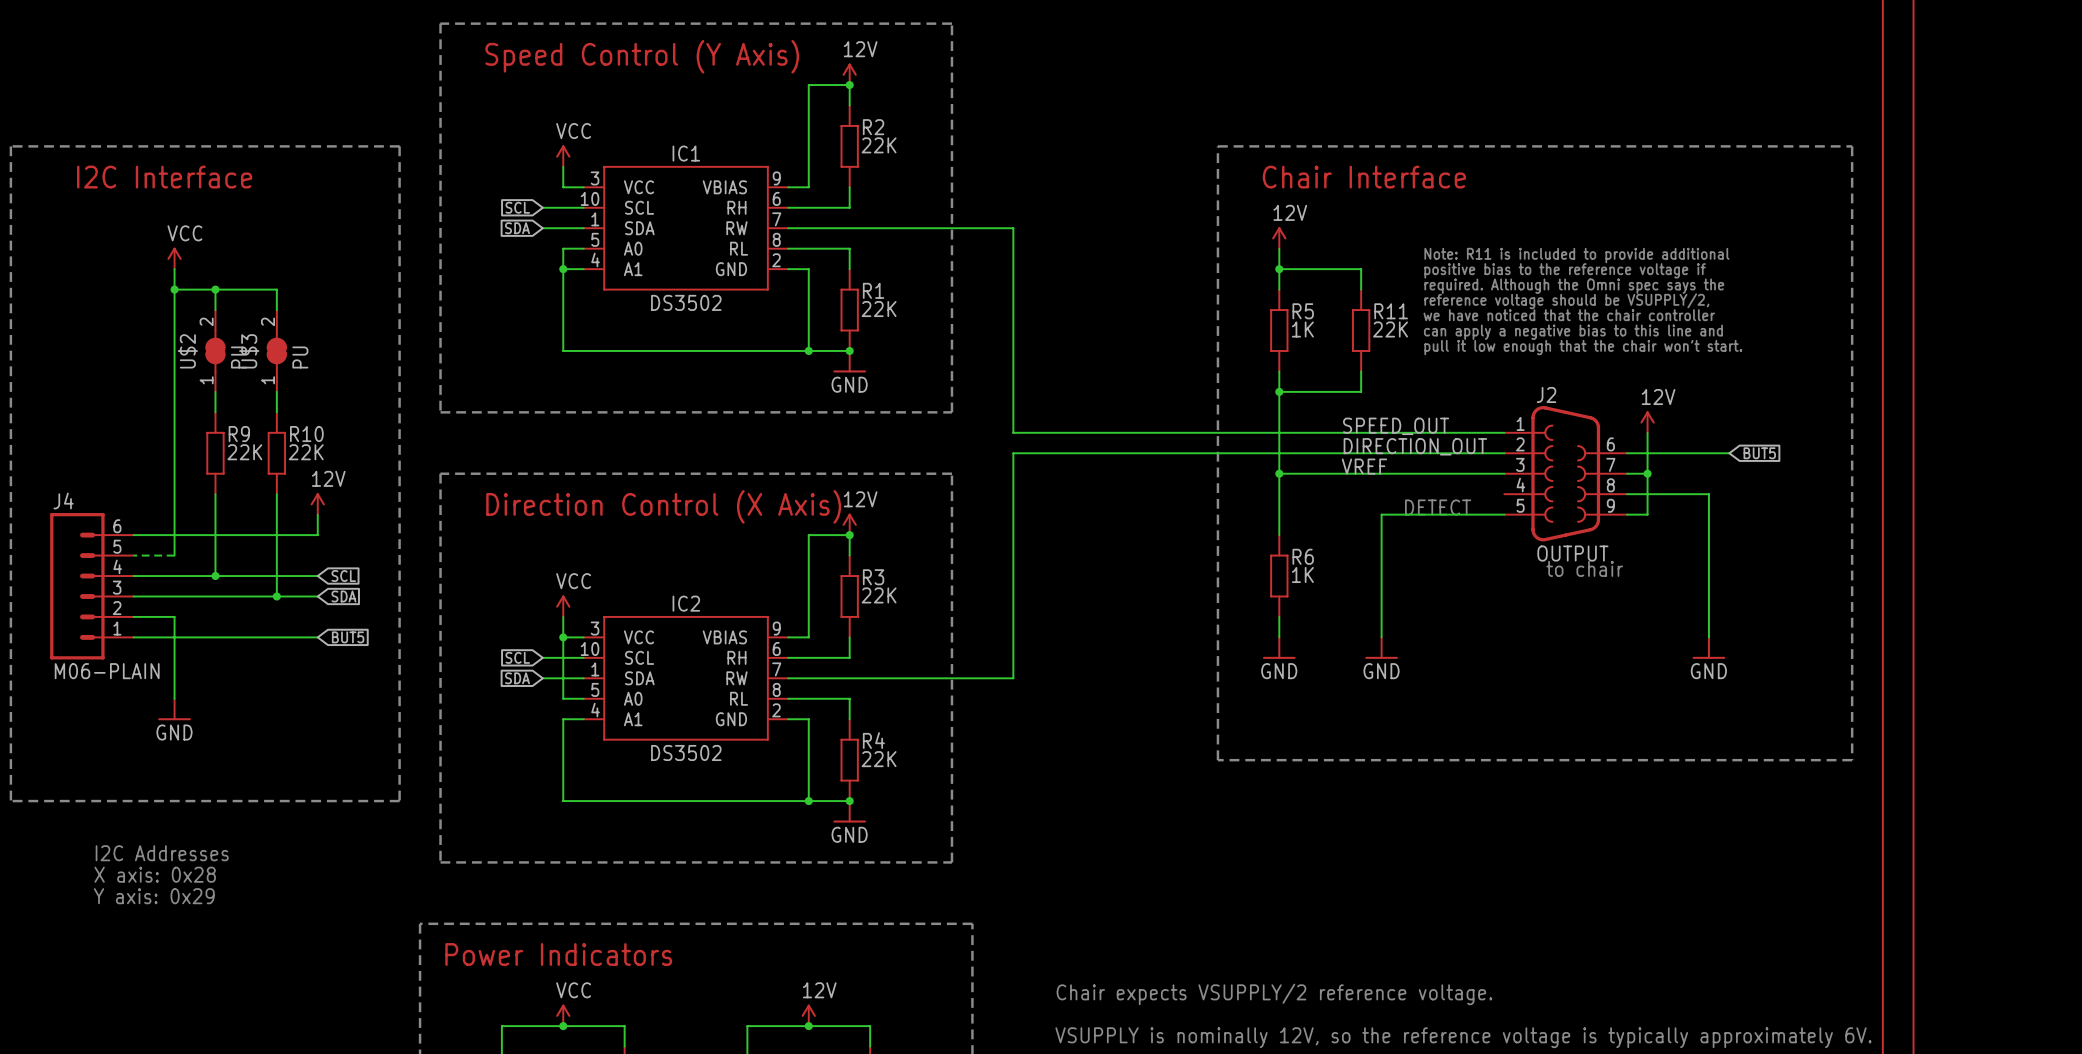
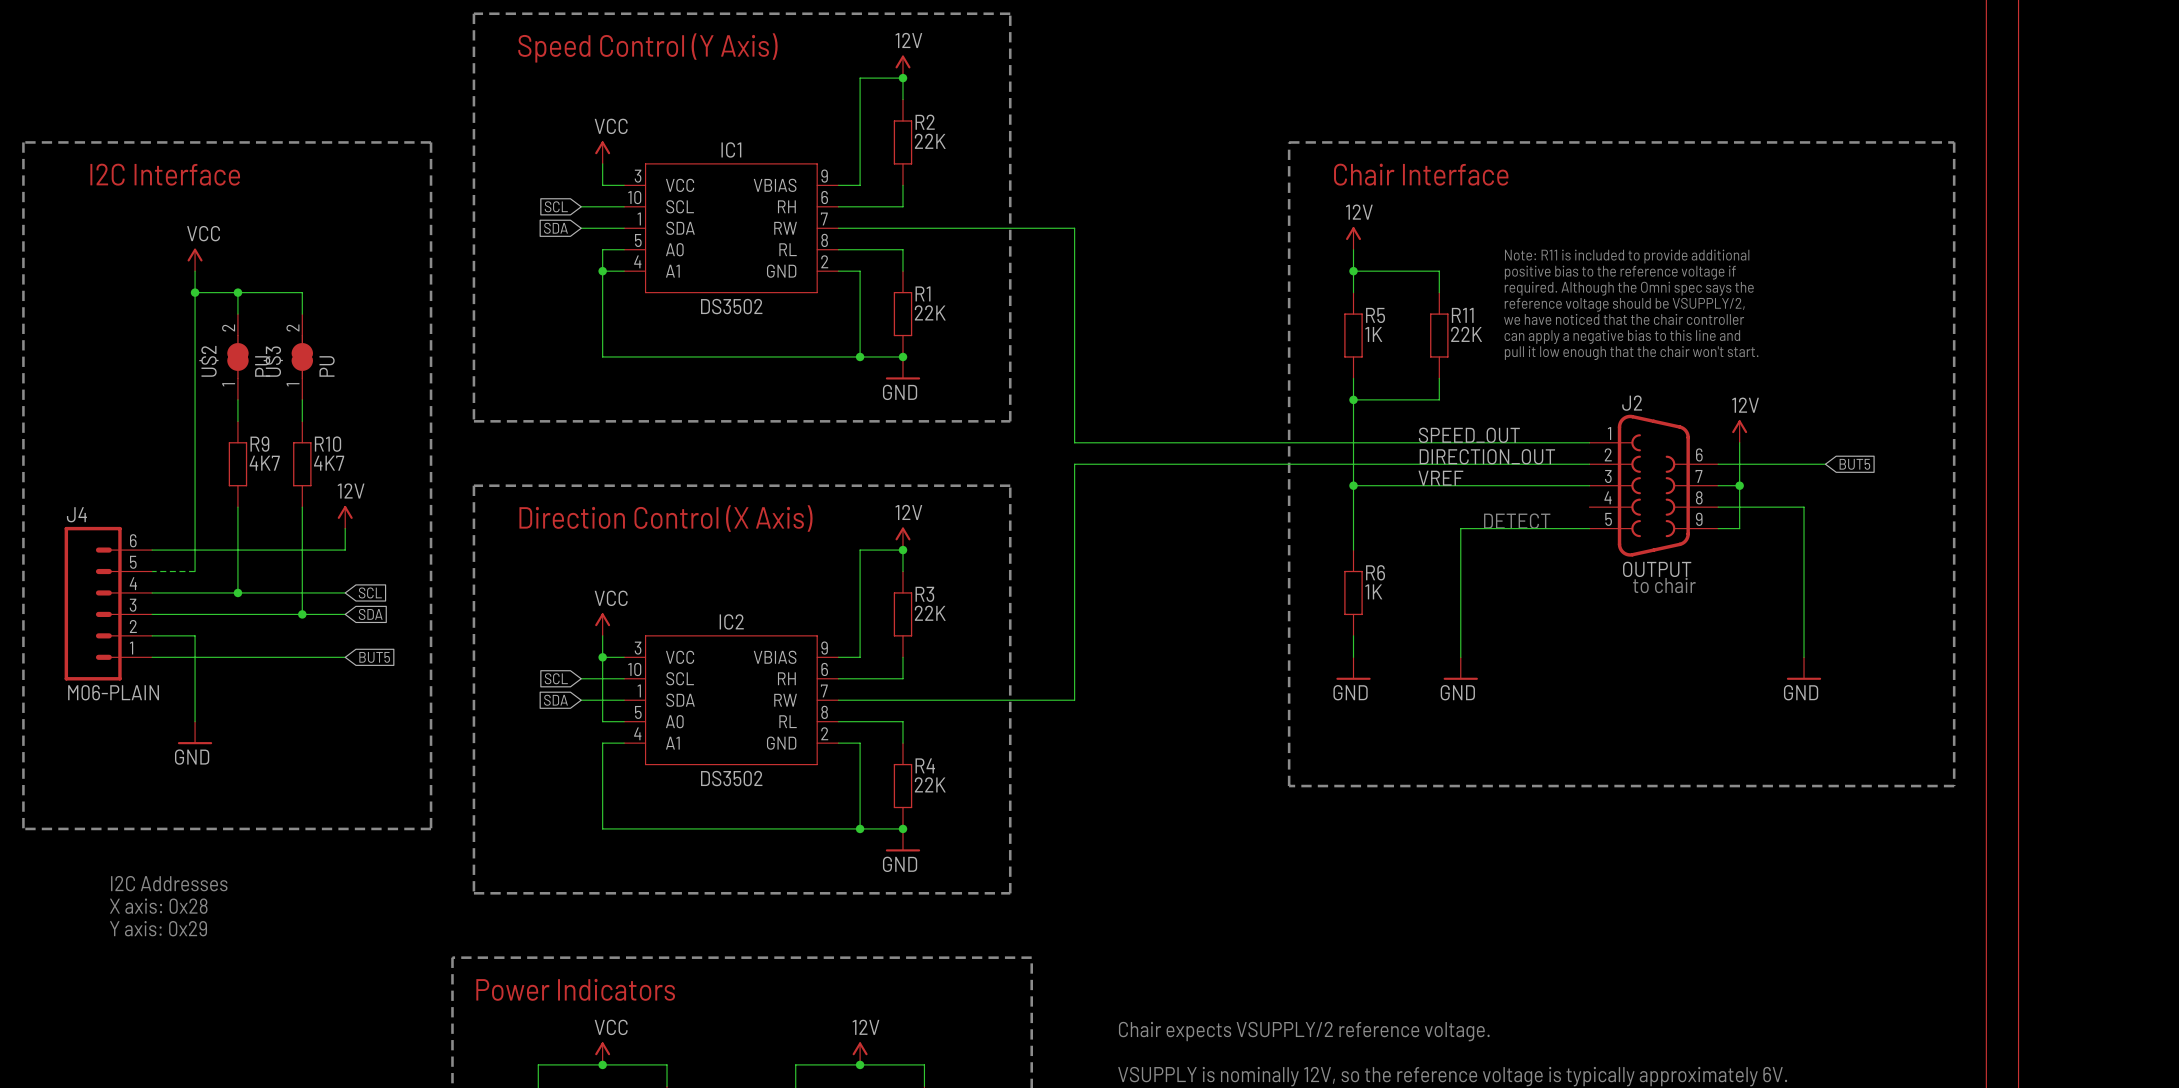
R9 value: 22K (244, 452) -> 4K7 (264, 463)
R10 value: 22K (306, 452) -> 4K7 (329, 463)

